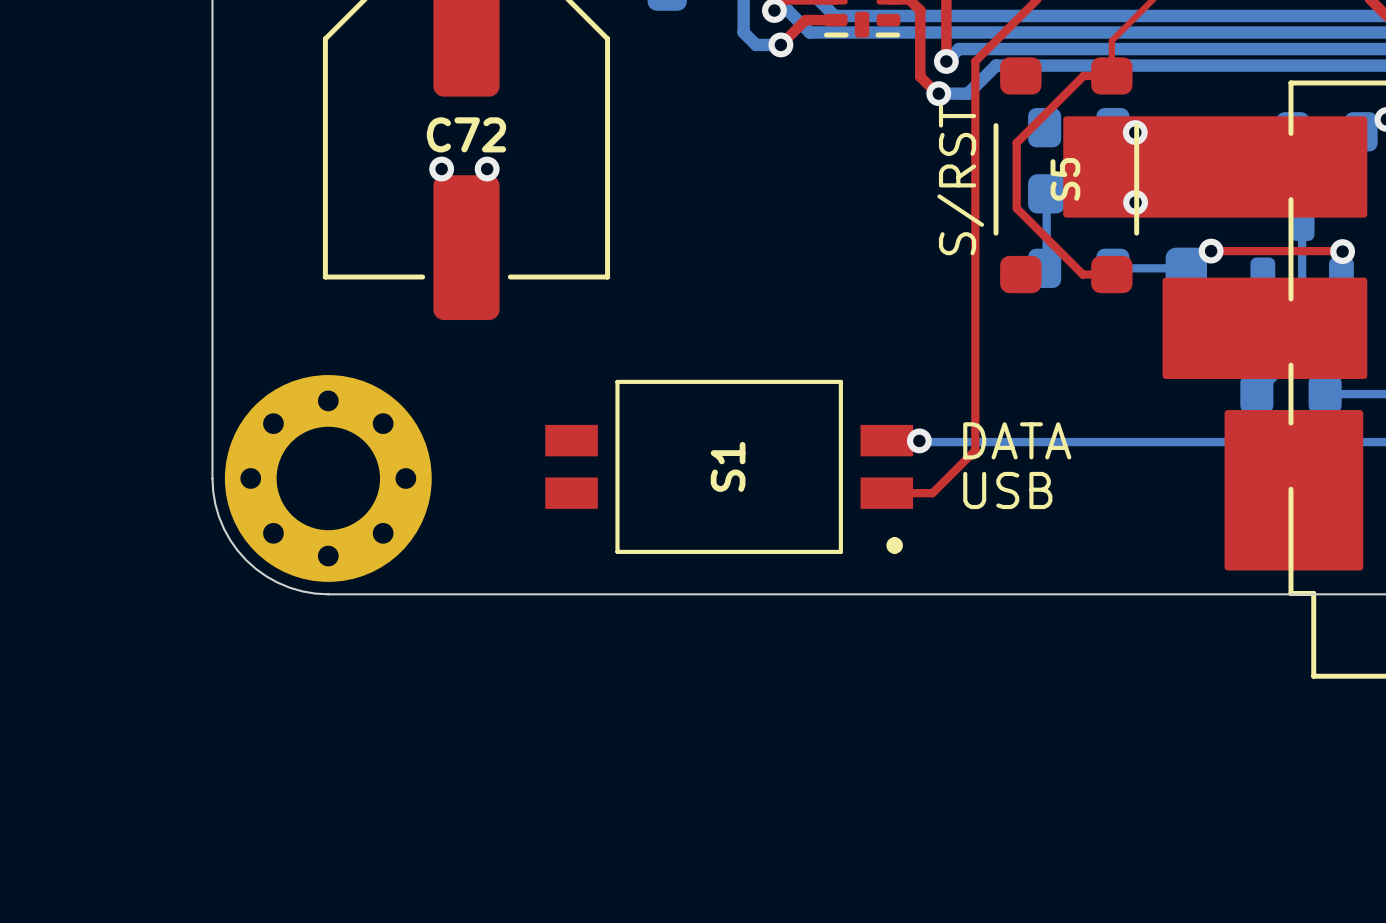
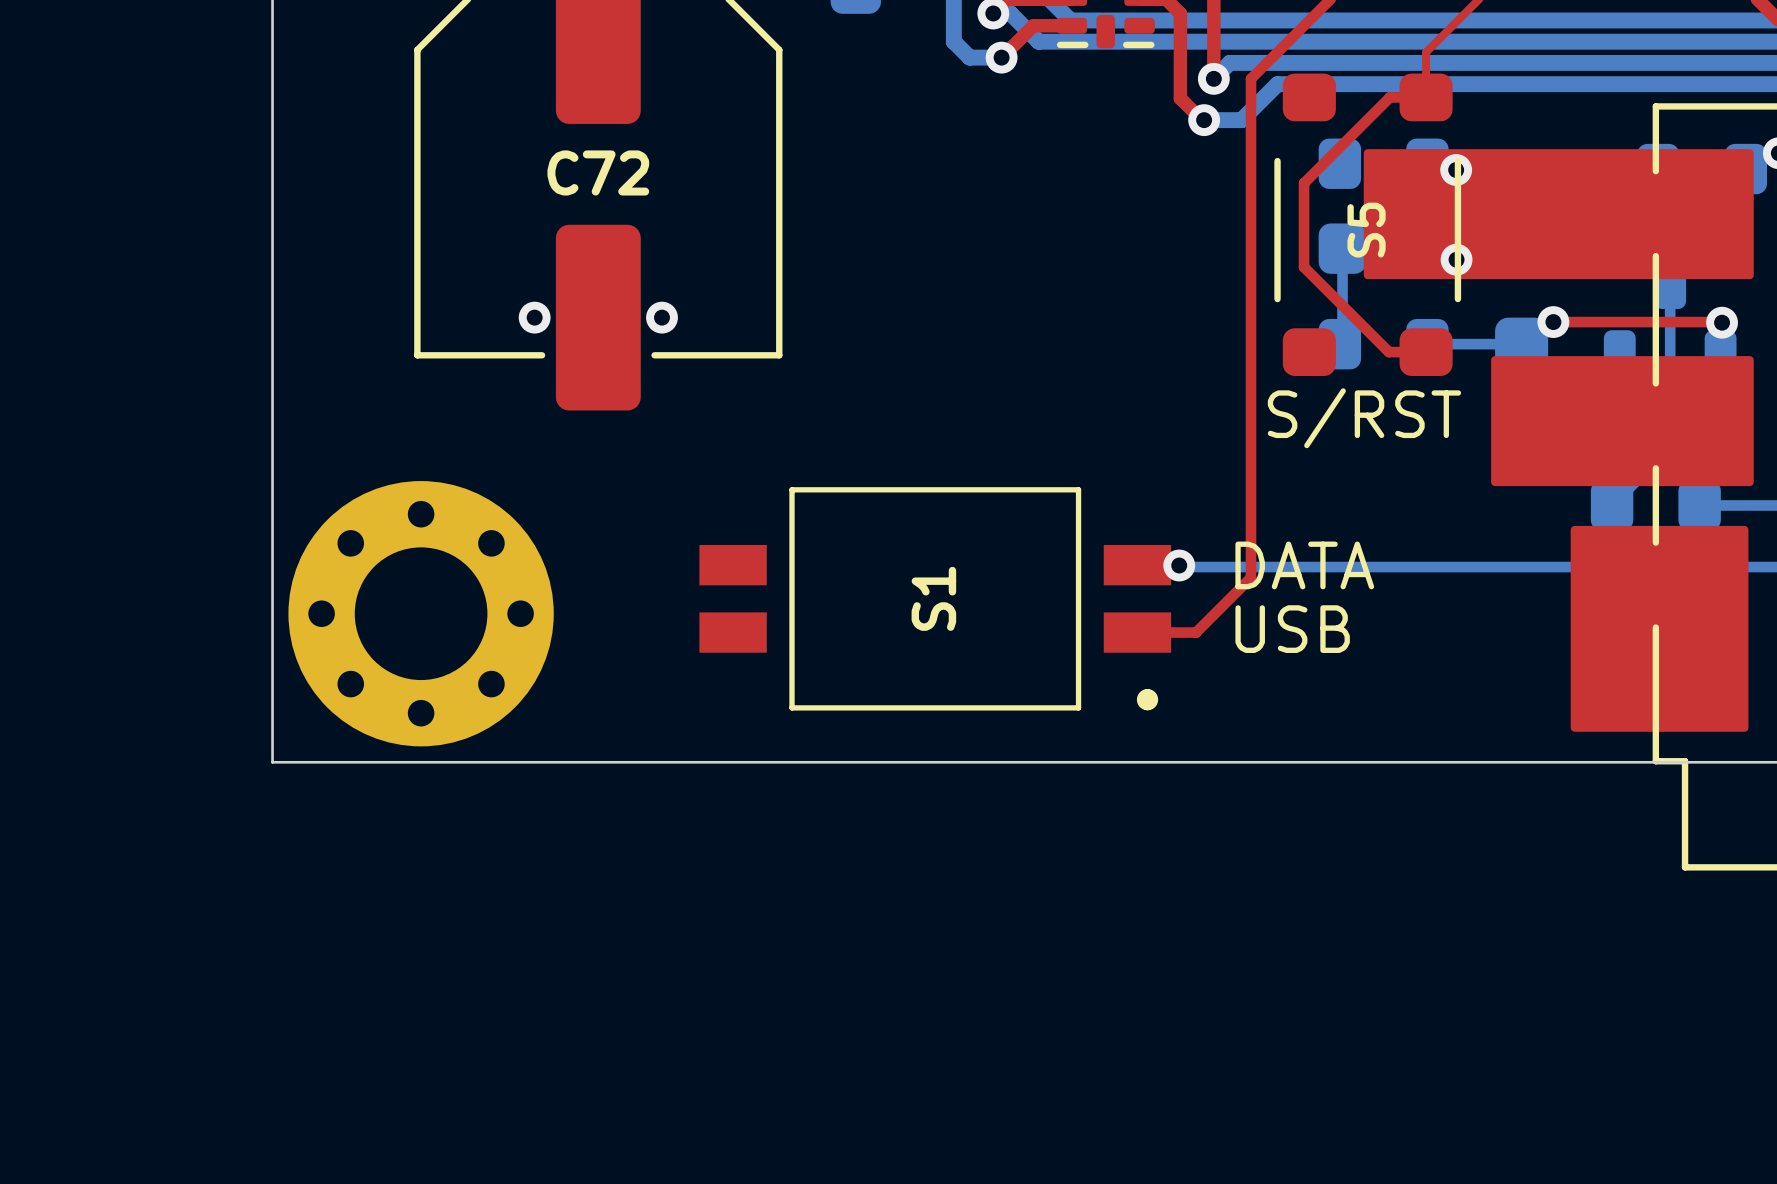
via: (441, 169) -> none
via: (487, 169) -> none
text rotation: 0° (960, 179) -> 90° clockwise (1364, 418)
via: none -> (534, 317)
via: none -> (662, 317)
board edge: (212, 478) (215, 504) (223, 528) (246, 560) (266, 576) (290, 587) (328, 594) -> (272, 613) (272, 762) (421, 762)

